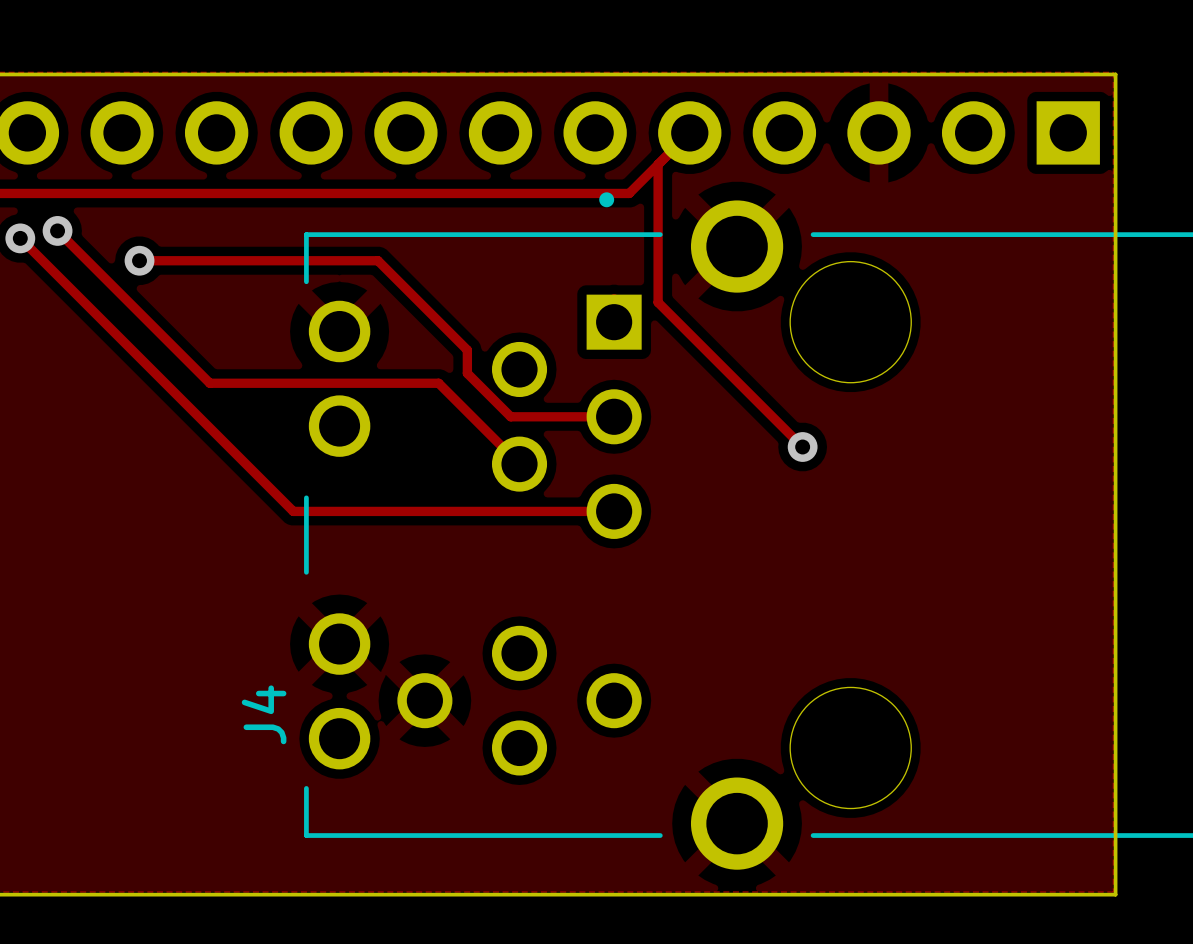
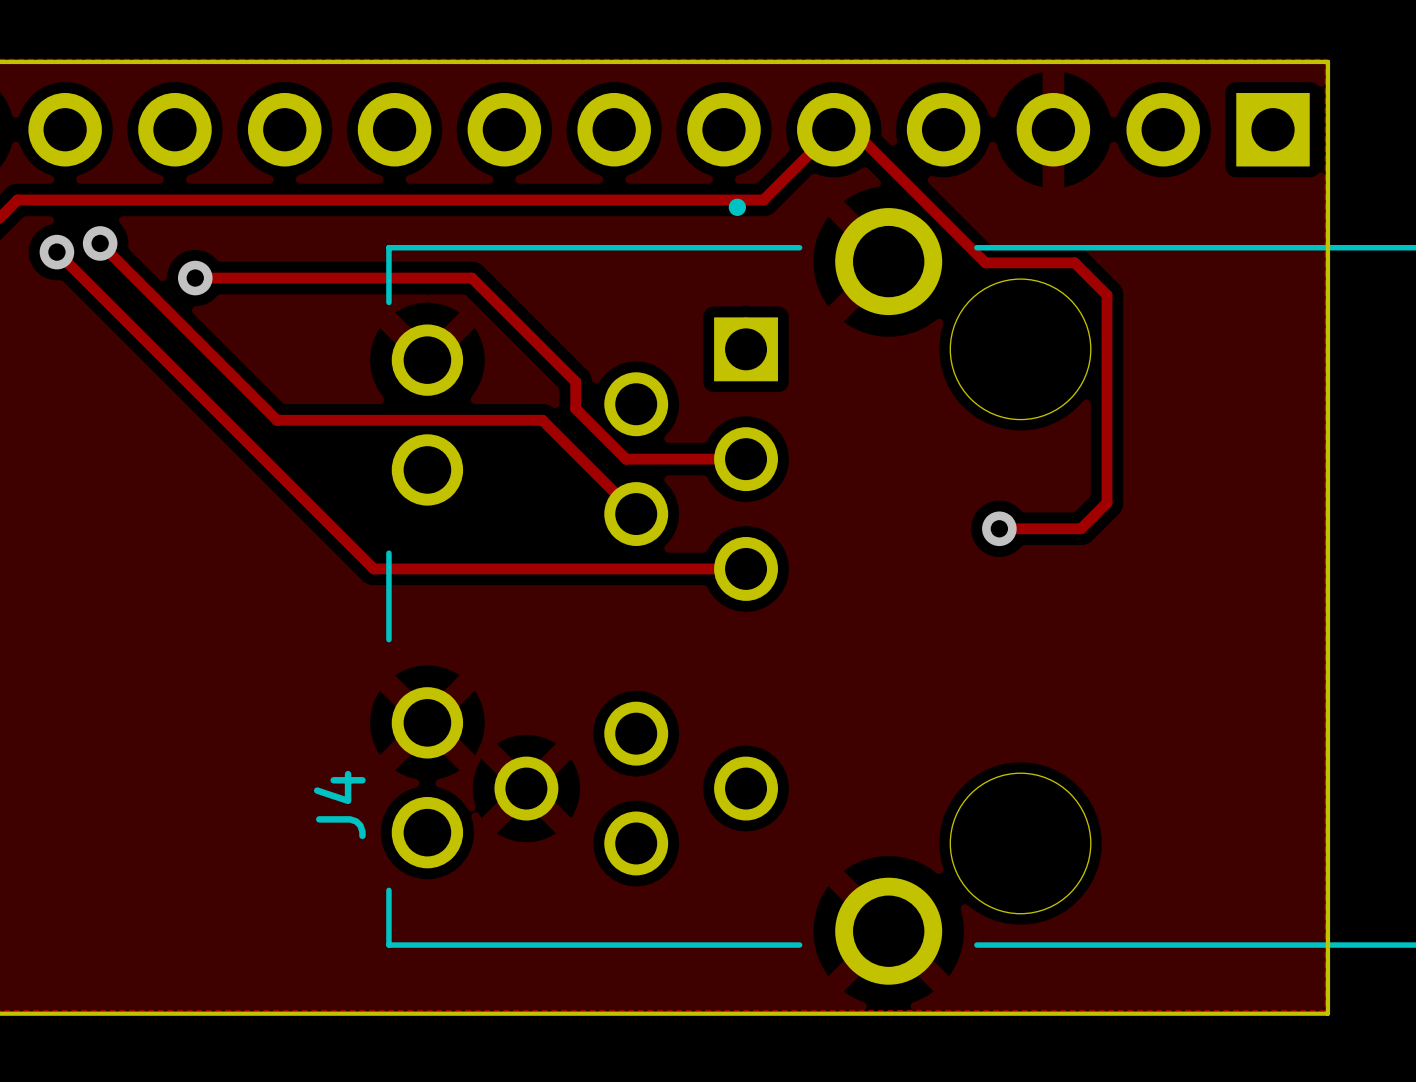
track: none -> (833, 129) (852, 129) (985, 262) (1074, 262) (1107, 295) (1107, 502) (1081, 528) (999, 528)
track: (658, 164) (658, 302) (802, 447) -> none
via position: (802, 447) -> (999, 528)

